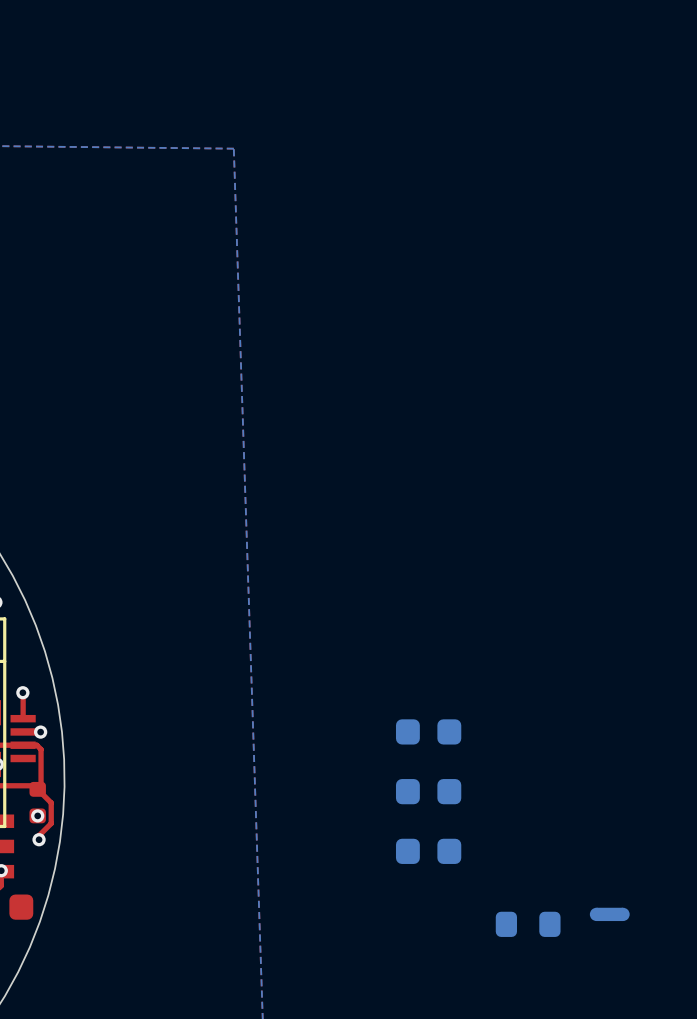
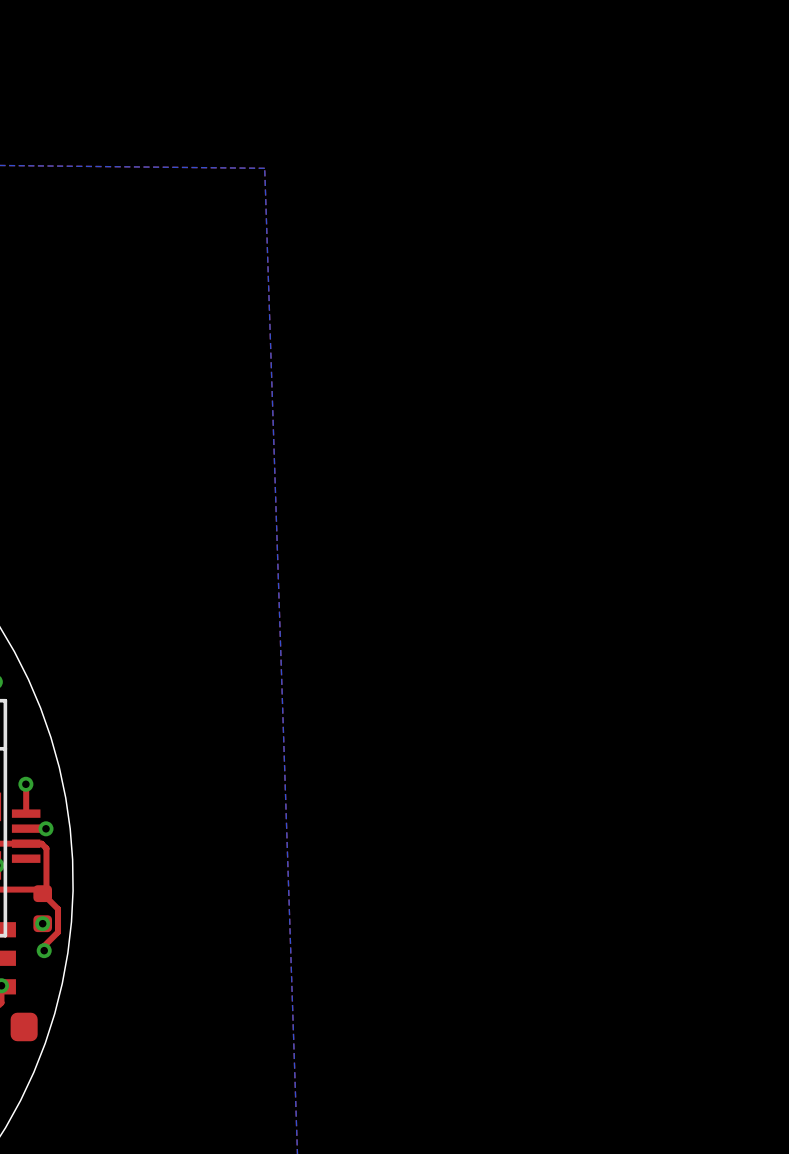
part: (428, 731) -> none
part: (428, 791) -> none
part: (428, 851) -> none
part: (609, 914) -> none
part: (528, 924) -> none

